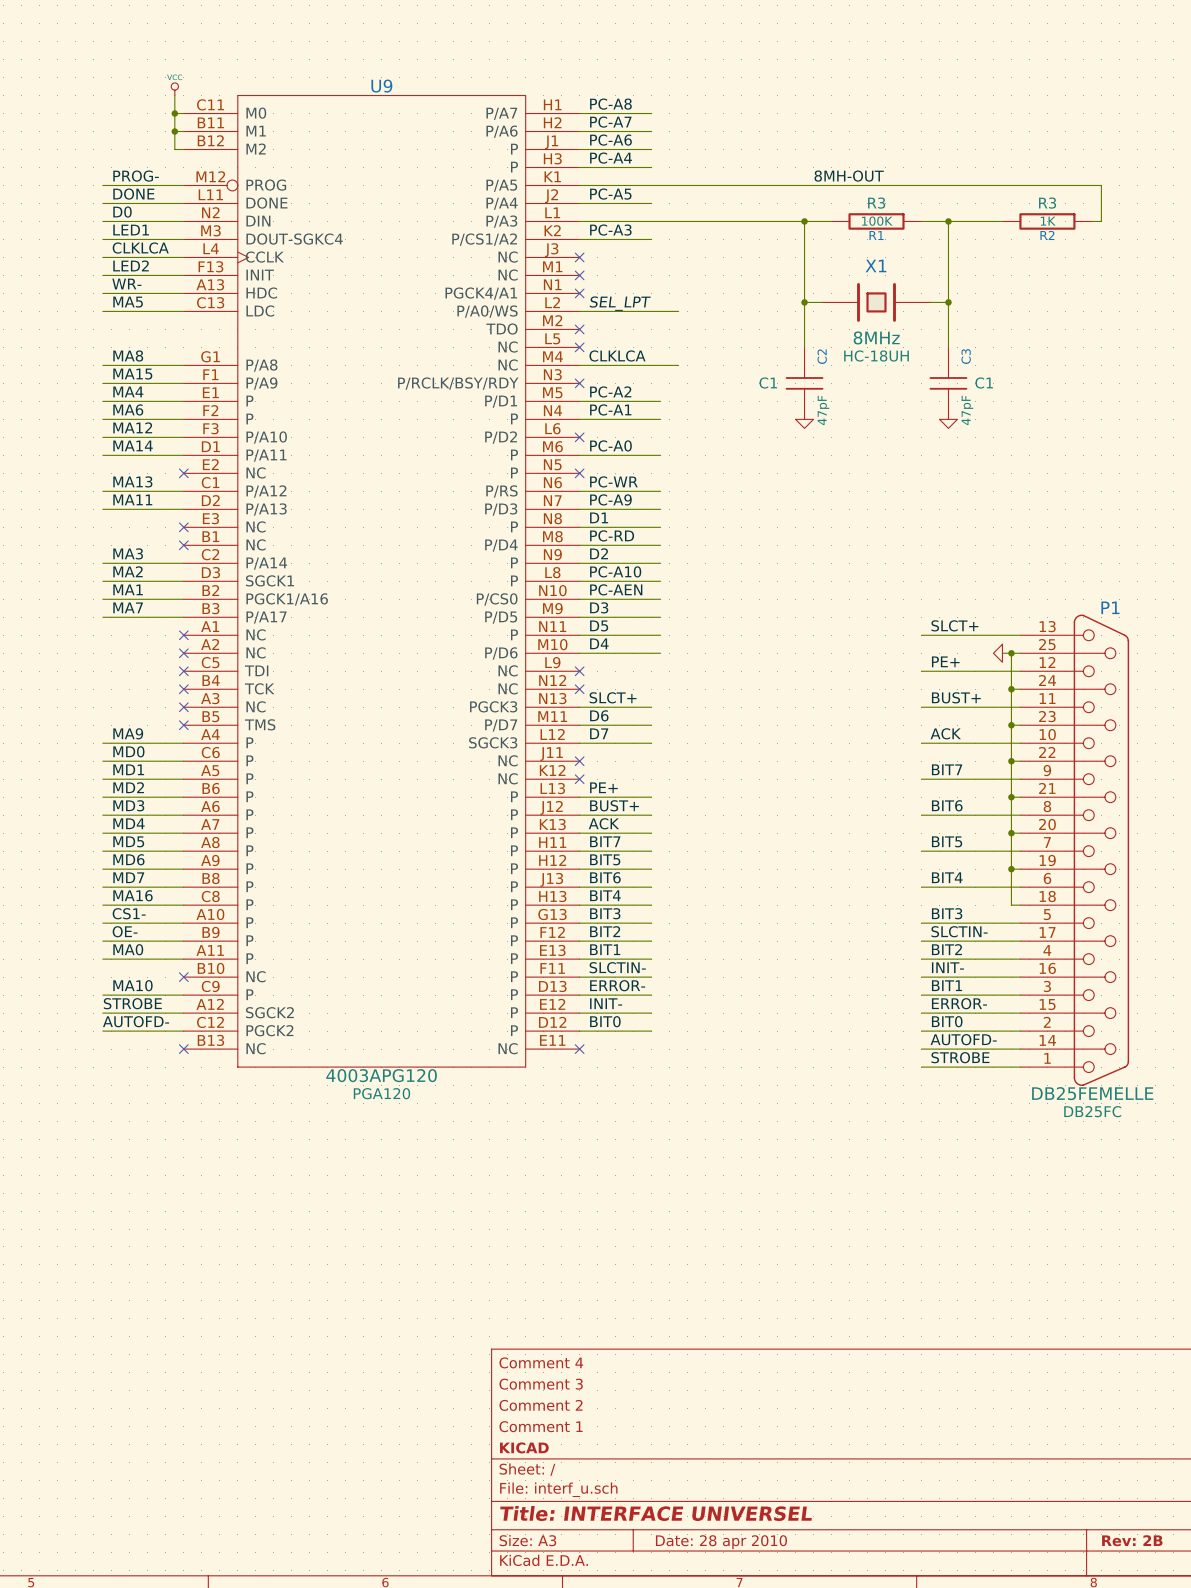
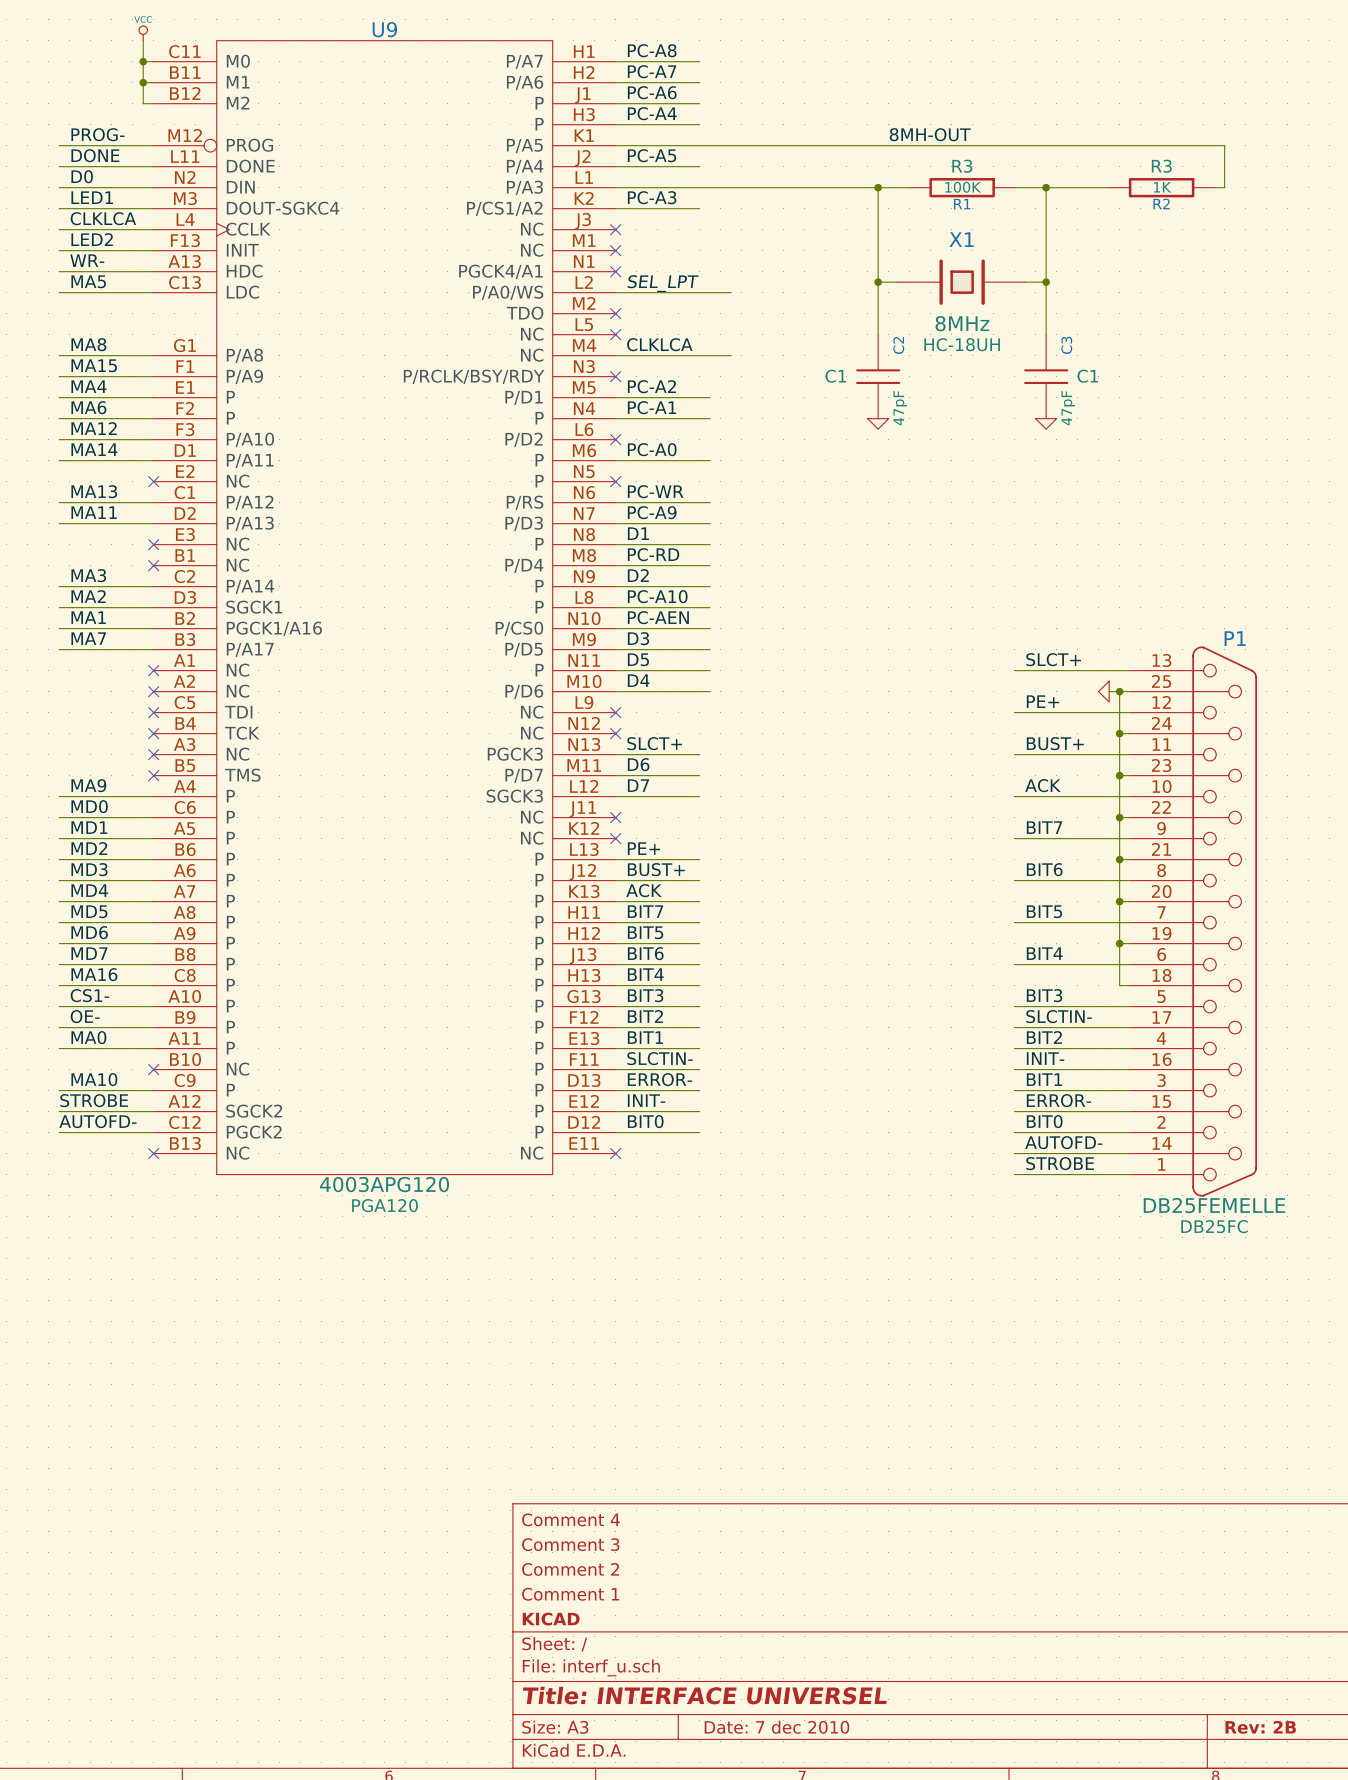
title block: Date: 28 apr 2010 (721, 1542) -> Date: 7 dec 2010 (776, 1727)

